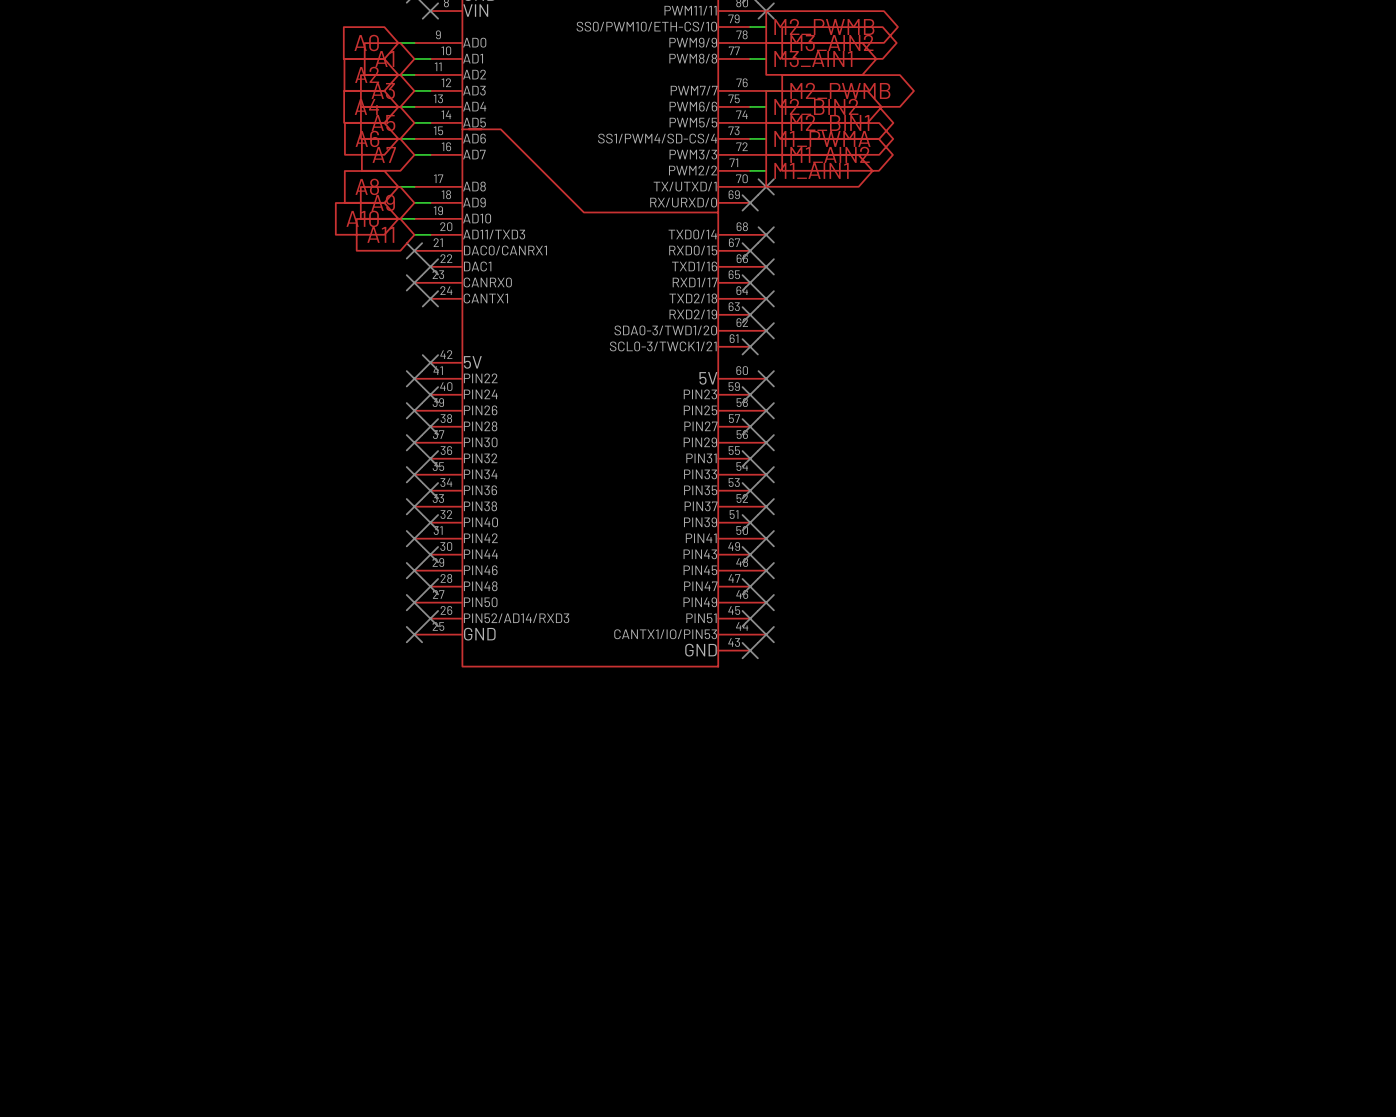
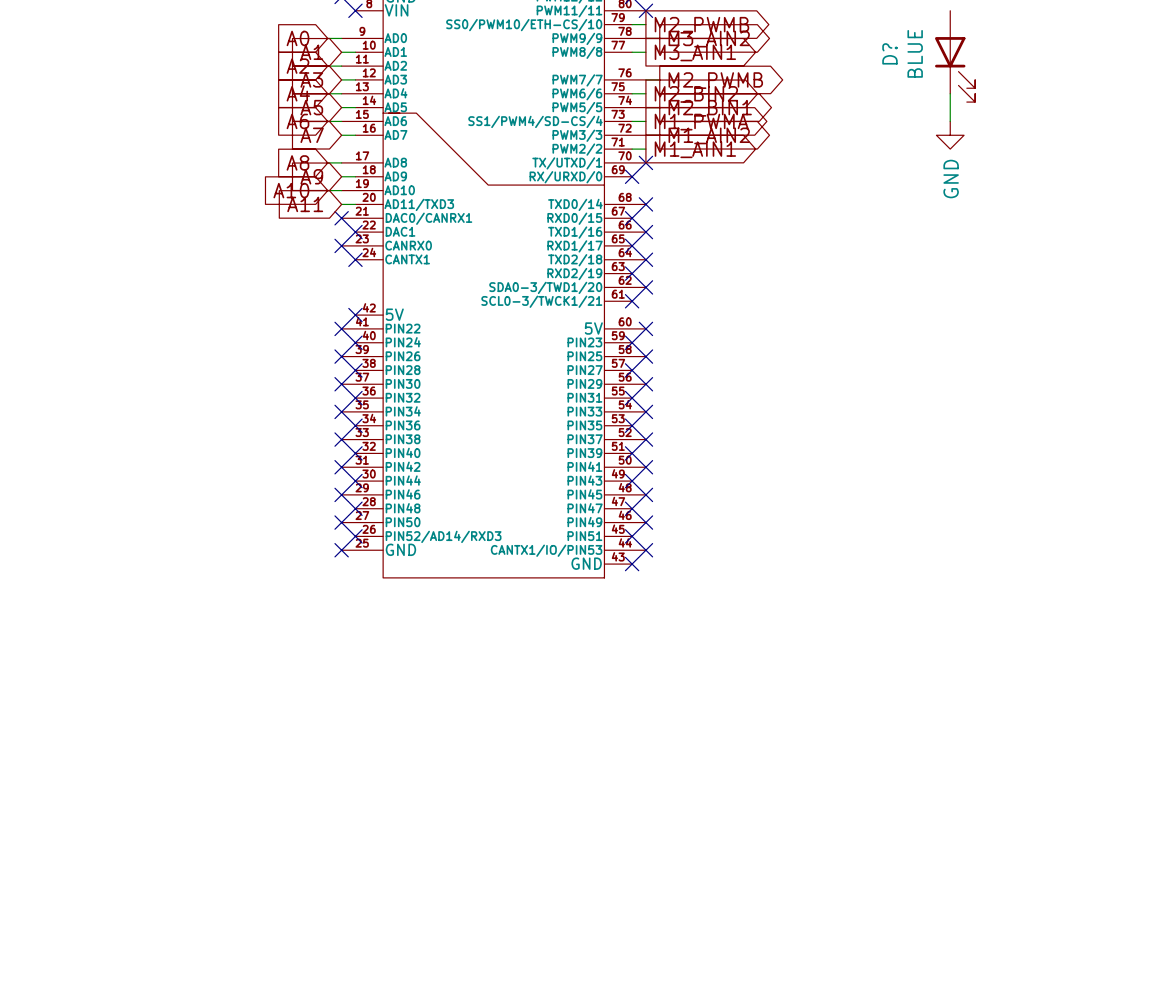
D?: none -> BLUE (955, 56)
wire: none -> (950, 93) (950, 121)
power symbol: none -> GND (950, 135)

